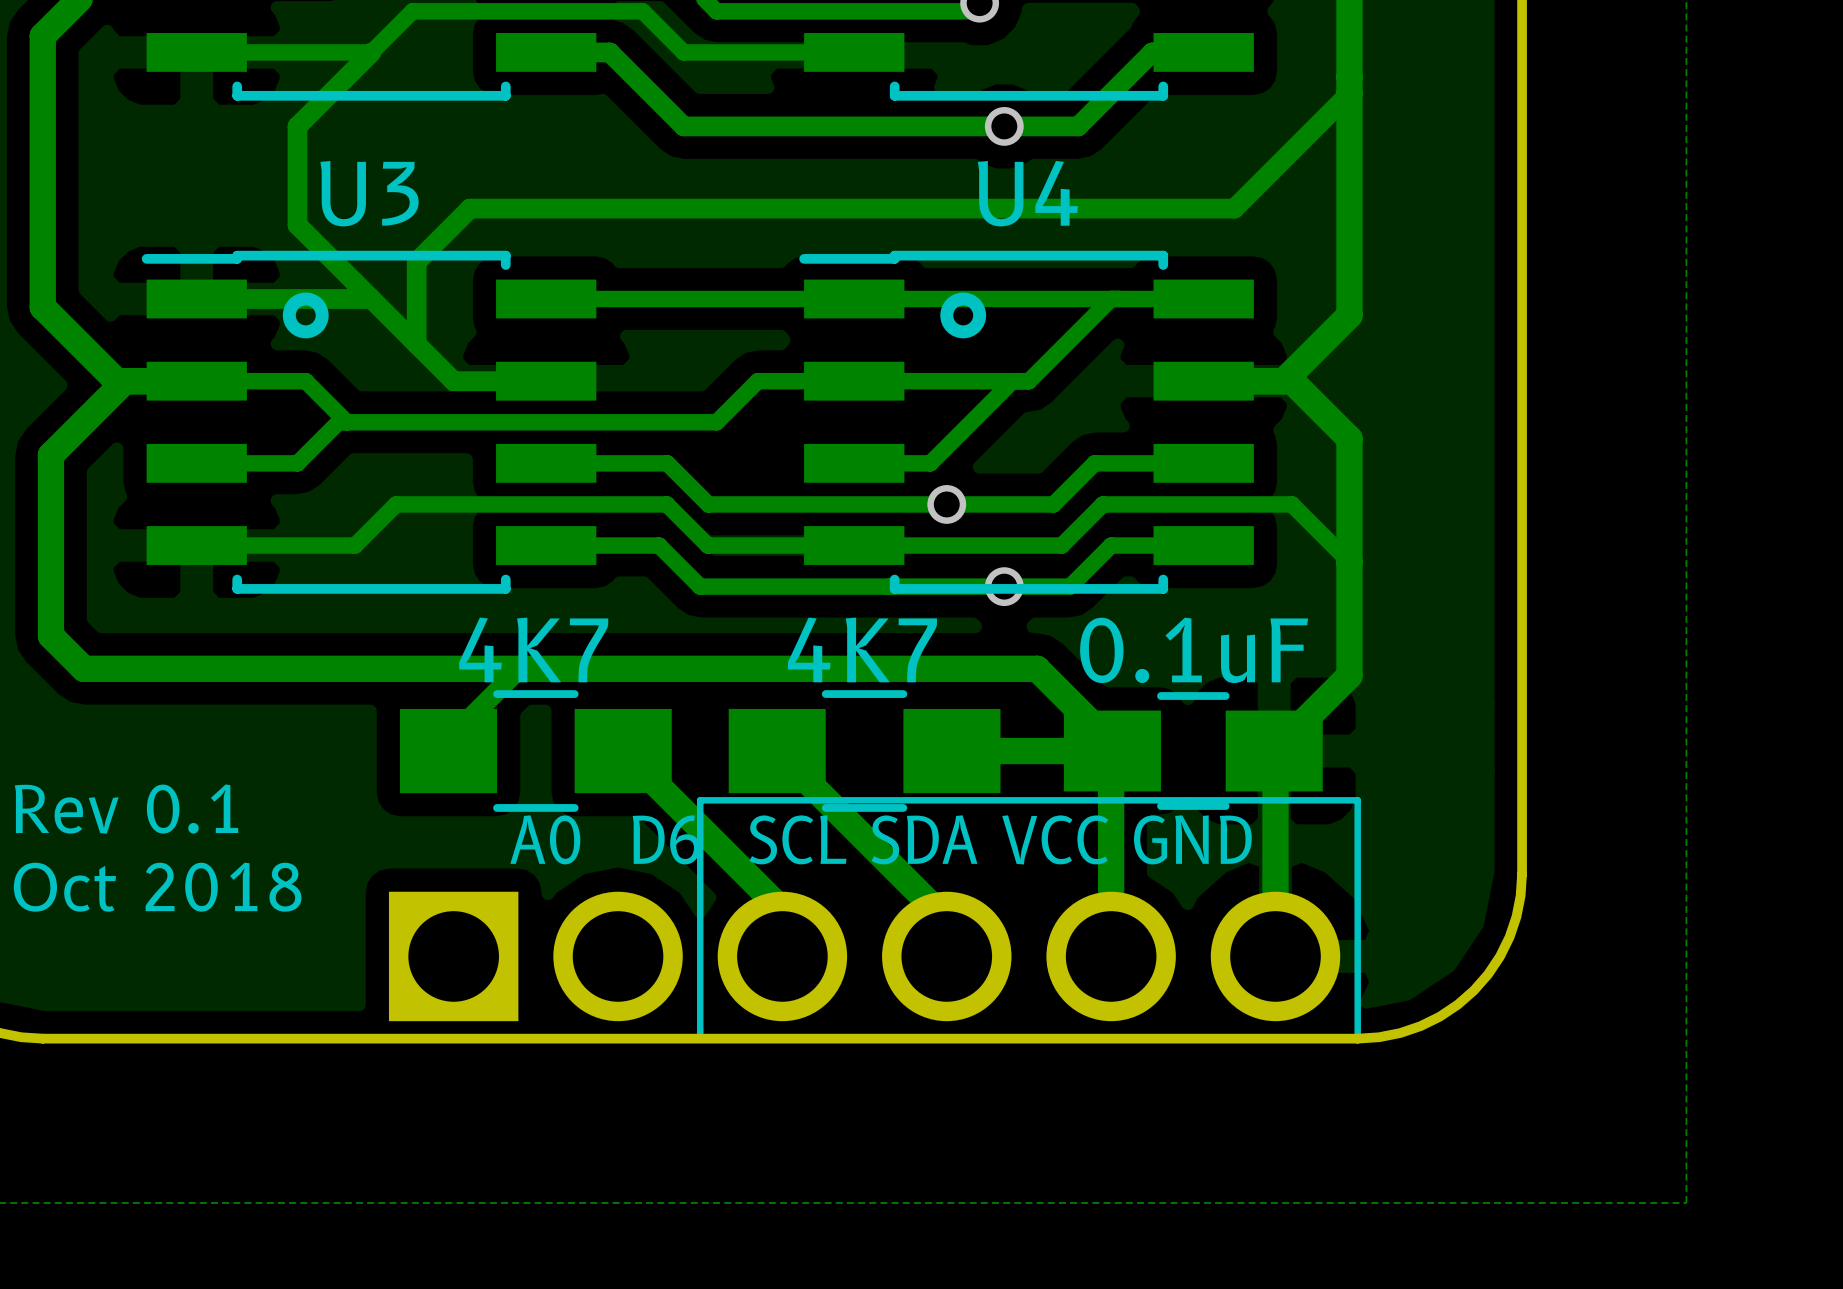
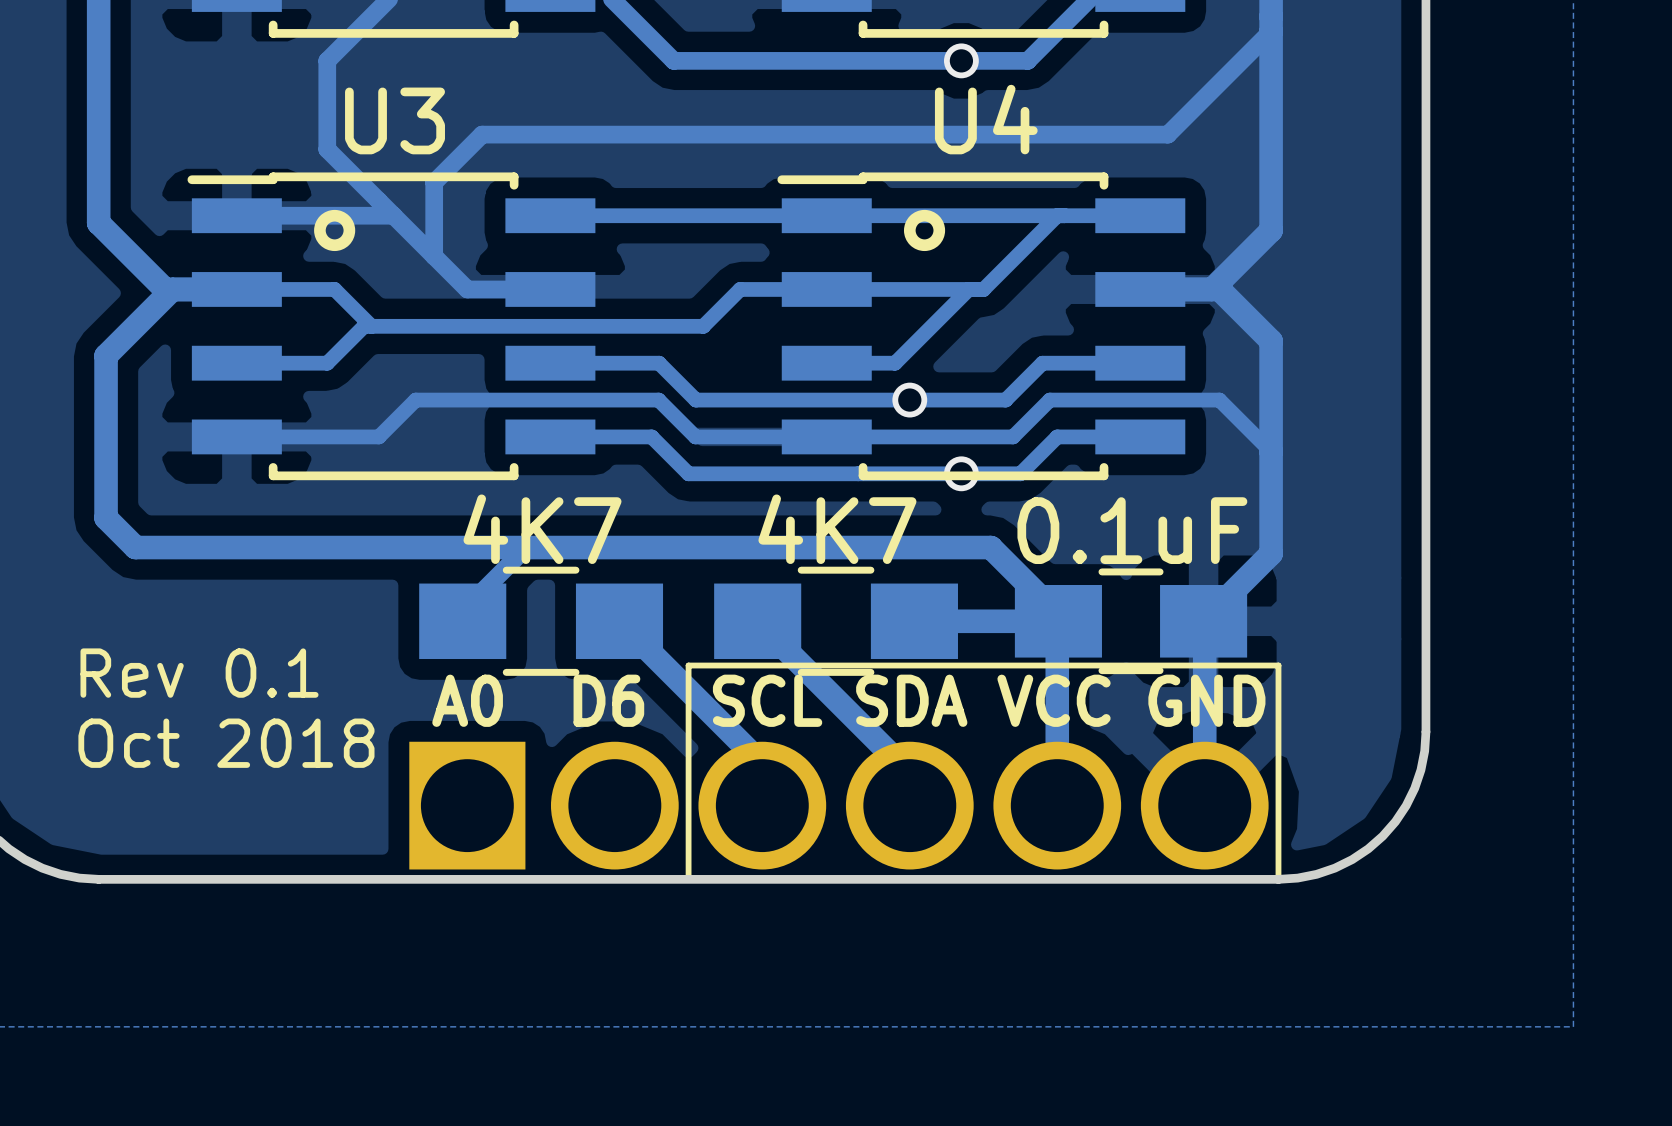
part footprint: [388, 797, 1361, 1042] -> [409, 662, 1282, 883]

